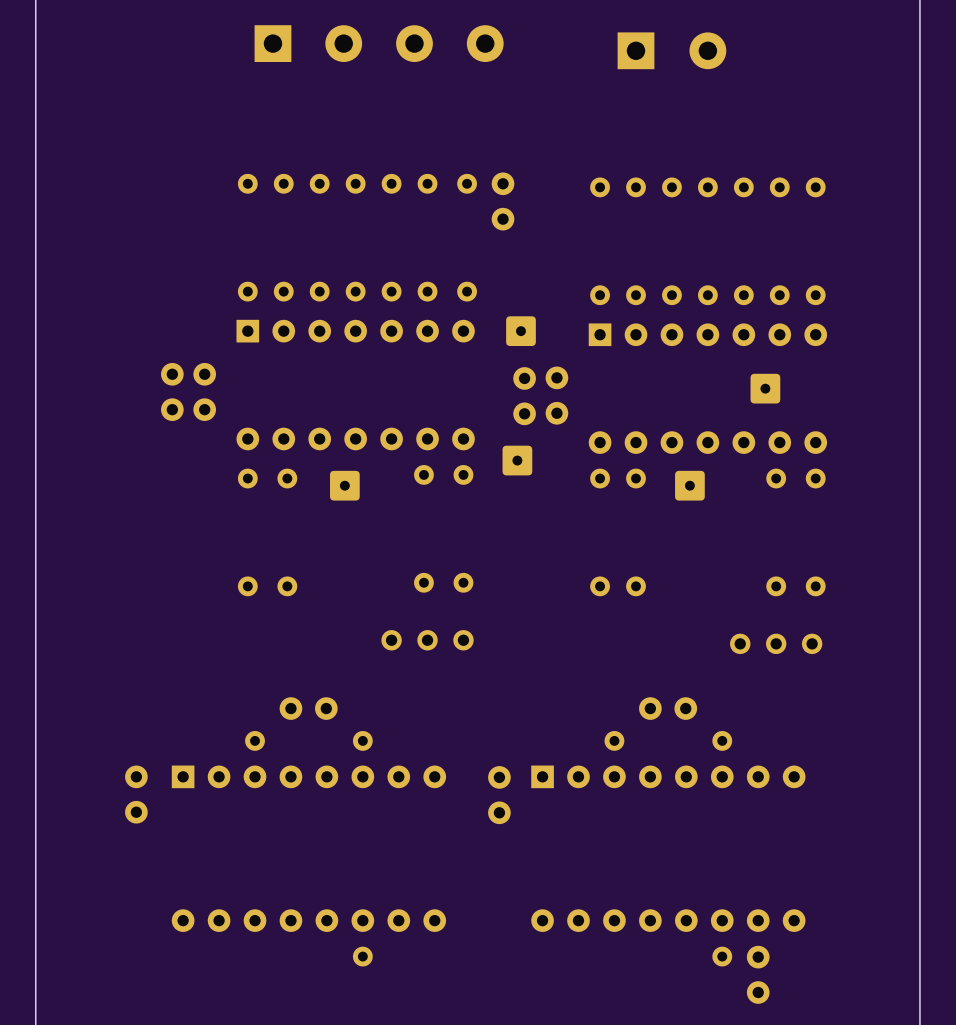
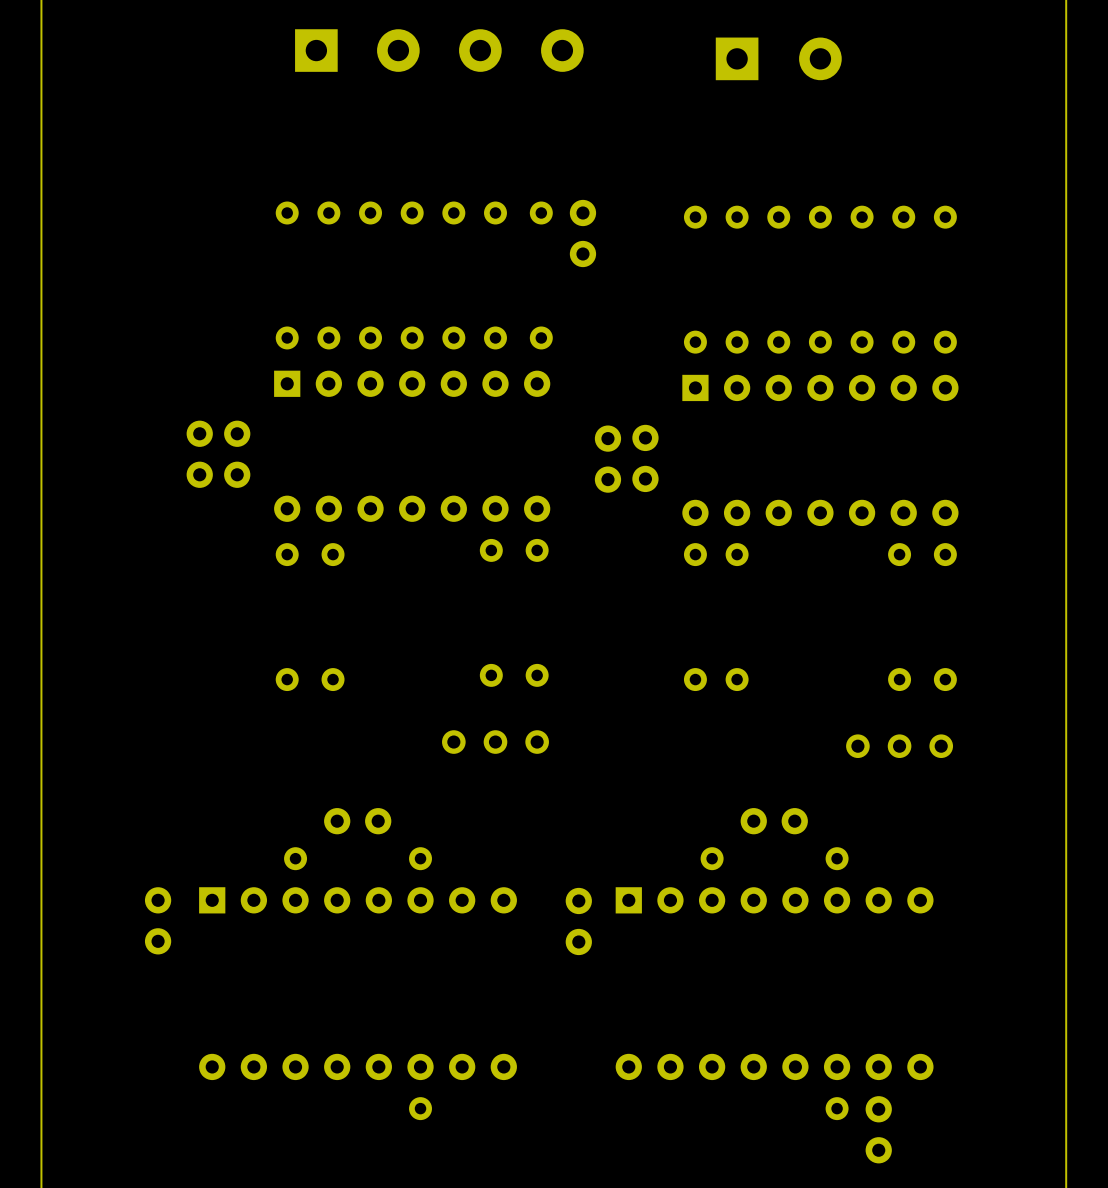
part: (520, 331) -> none
part: (765, 388) -> none
part: (517, 460) -> none
part: (344, 485) -> none
part: (689, 485) -> none

